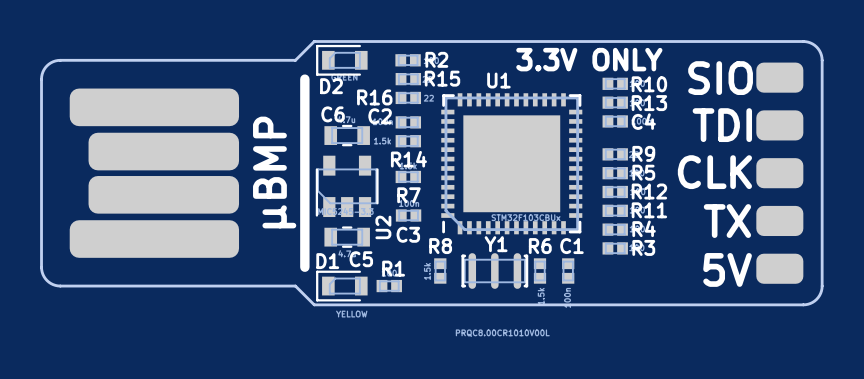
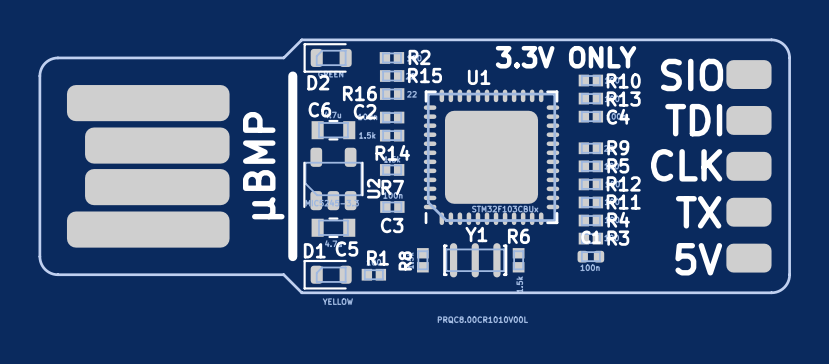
D2 footprint: [316, 44, 368, 76] -> [303, 43, 352, 73]
U1 footprint: [441, 93, 583, 235] -> [423, 89, 560, 226]
U2 footprint: [315, 155, 379, 218] -> [303, 147, 364, 211]
U2 name position: U2 (383, 227) -> U2 (373, 188)
R8 name rotation: 0° (440, 246) -> 90° counterclockwise (405, 260)
C1 footprint: [562, 258, 575, 284] -> [577, 250, 605, 263]
D1 footprint: [316, 270, 368, 302] -> [303, 259, 352, 290]

